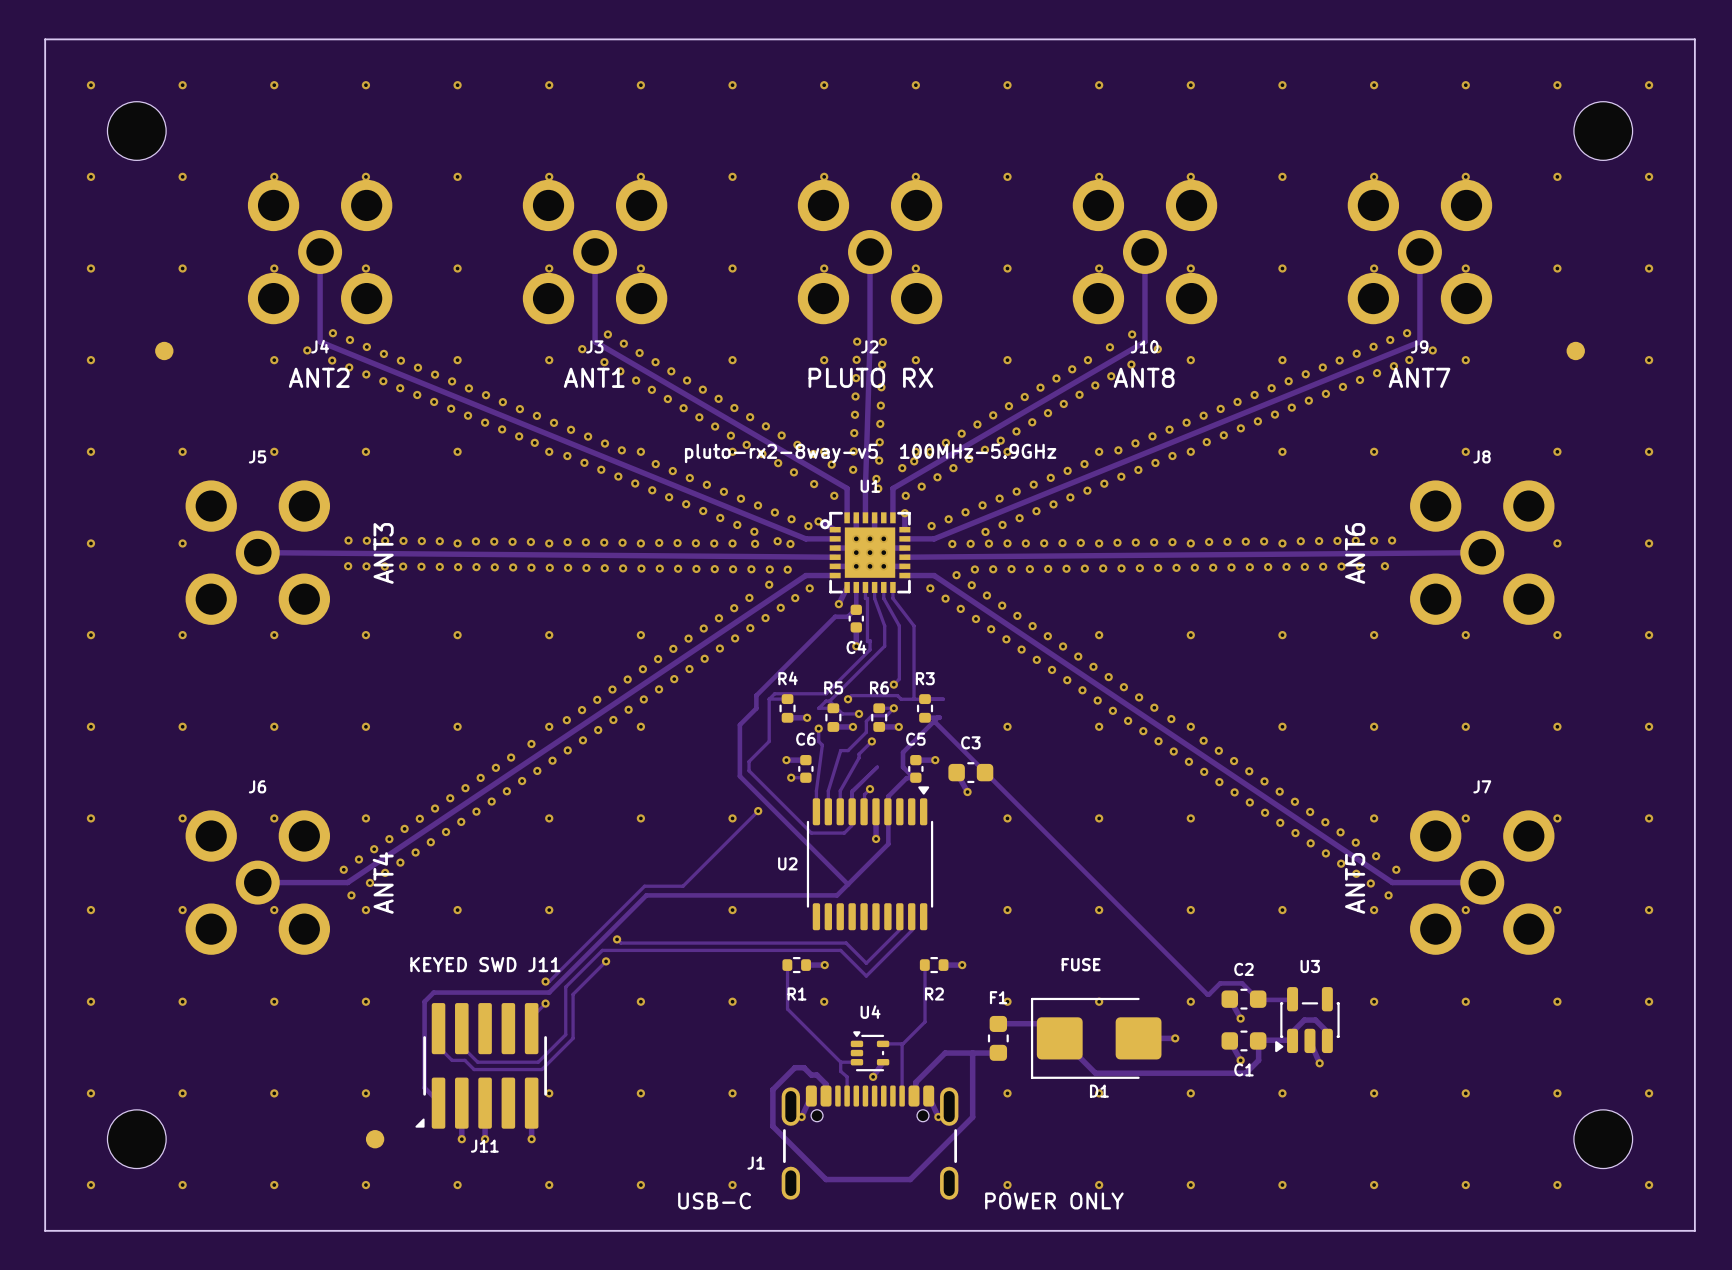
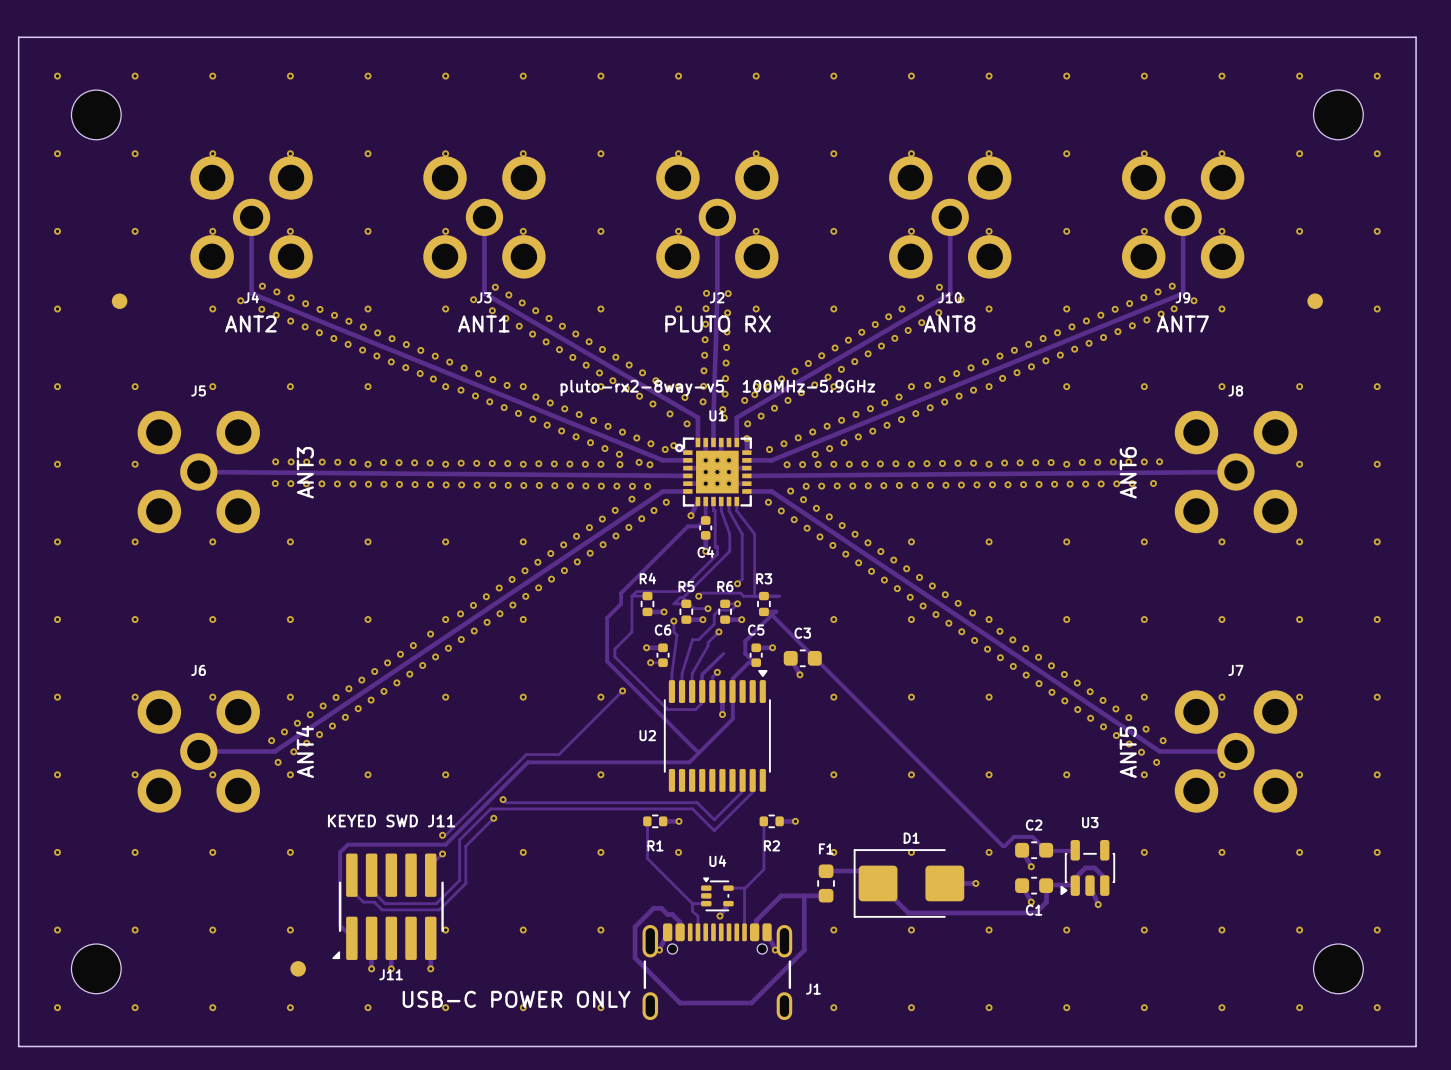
text: FUSE (1081, 964) -> none
D1 name position: D1 (1099, 1091) -> D1 (911, 838)
J1 name position: J1 (756, 1163) -> J1 (813, 989)
text: none -> USB-C POWER ONLY (516, 999)
text: USB-C (714, 1200) -> none
text: POWER ONLY (1054, 1200) -> none

